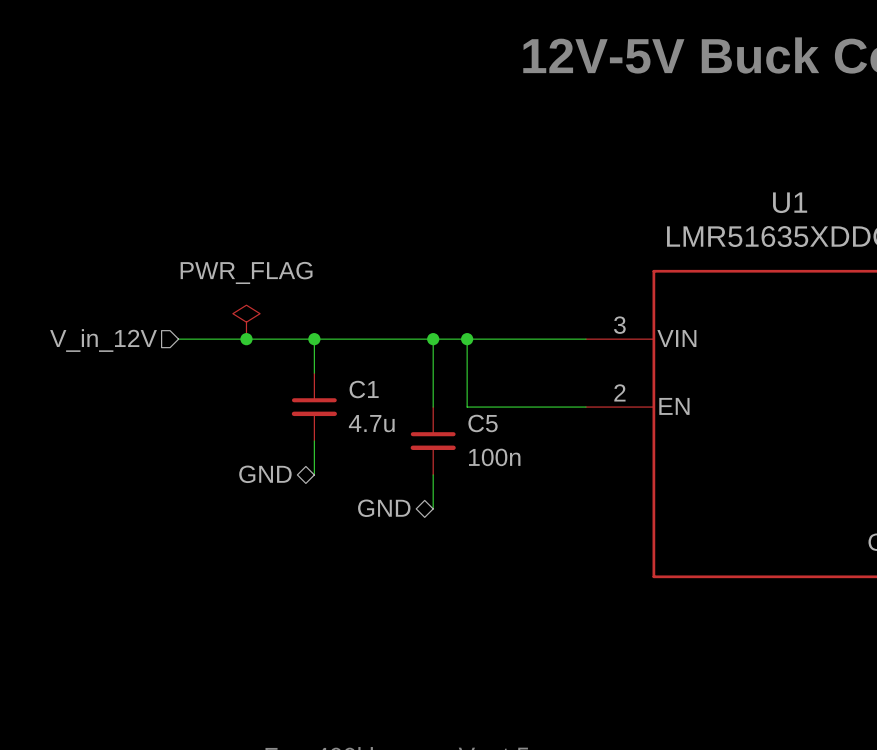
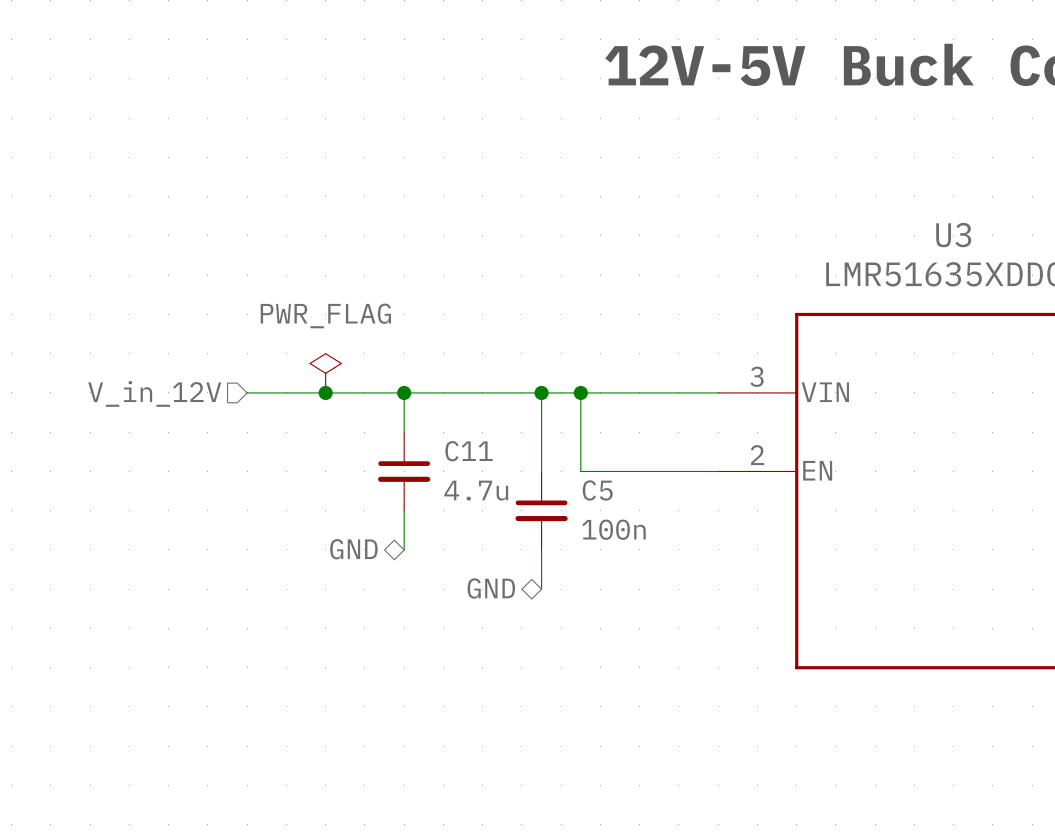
U1 name: U1 (790, 202) -> U3 (953, 235)
C1 name: C1 (364, 389) -> C11 (469, 451)

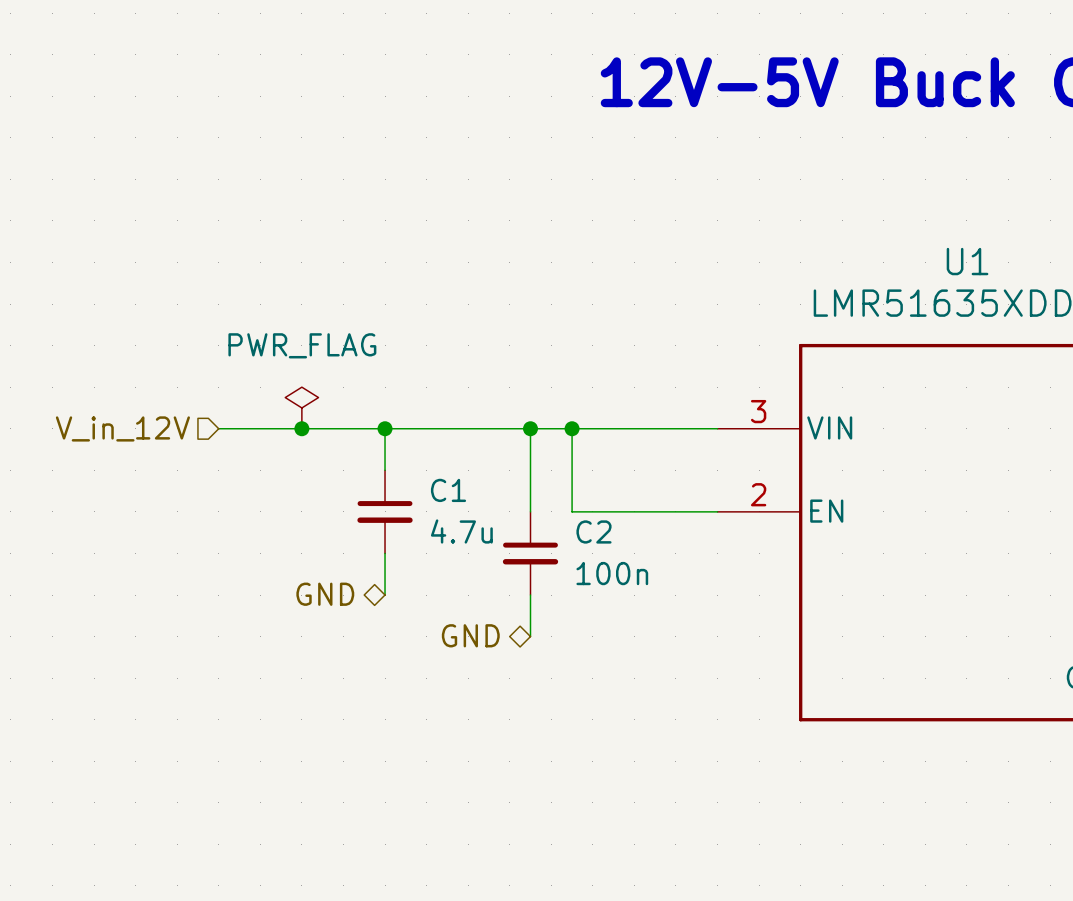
U3 name: U3 (953, 235) -> U1 (967, 261)
C11 name: C11 (469, 451) -> C1 (448, 490)
C5 name: C5 (597, 490) -> C2 (593, 531)

